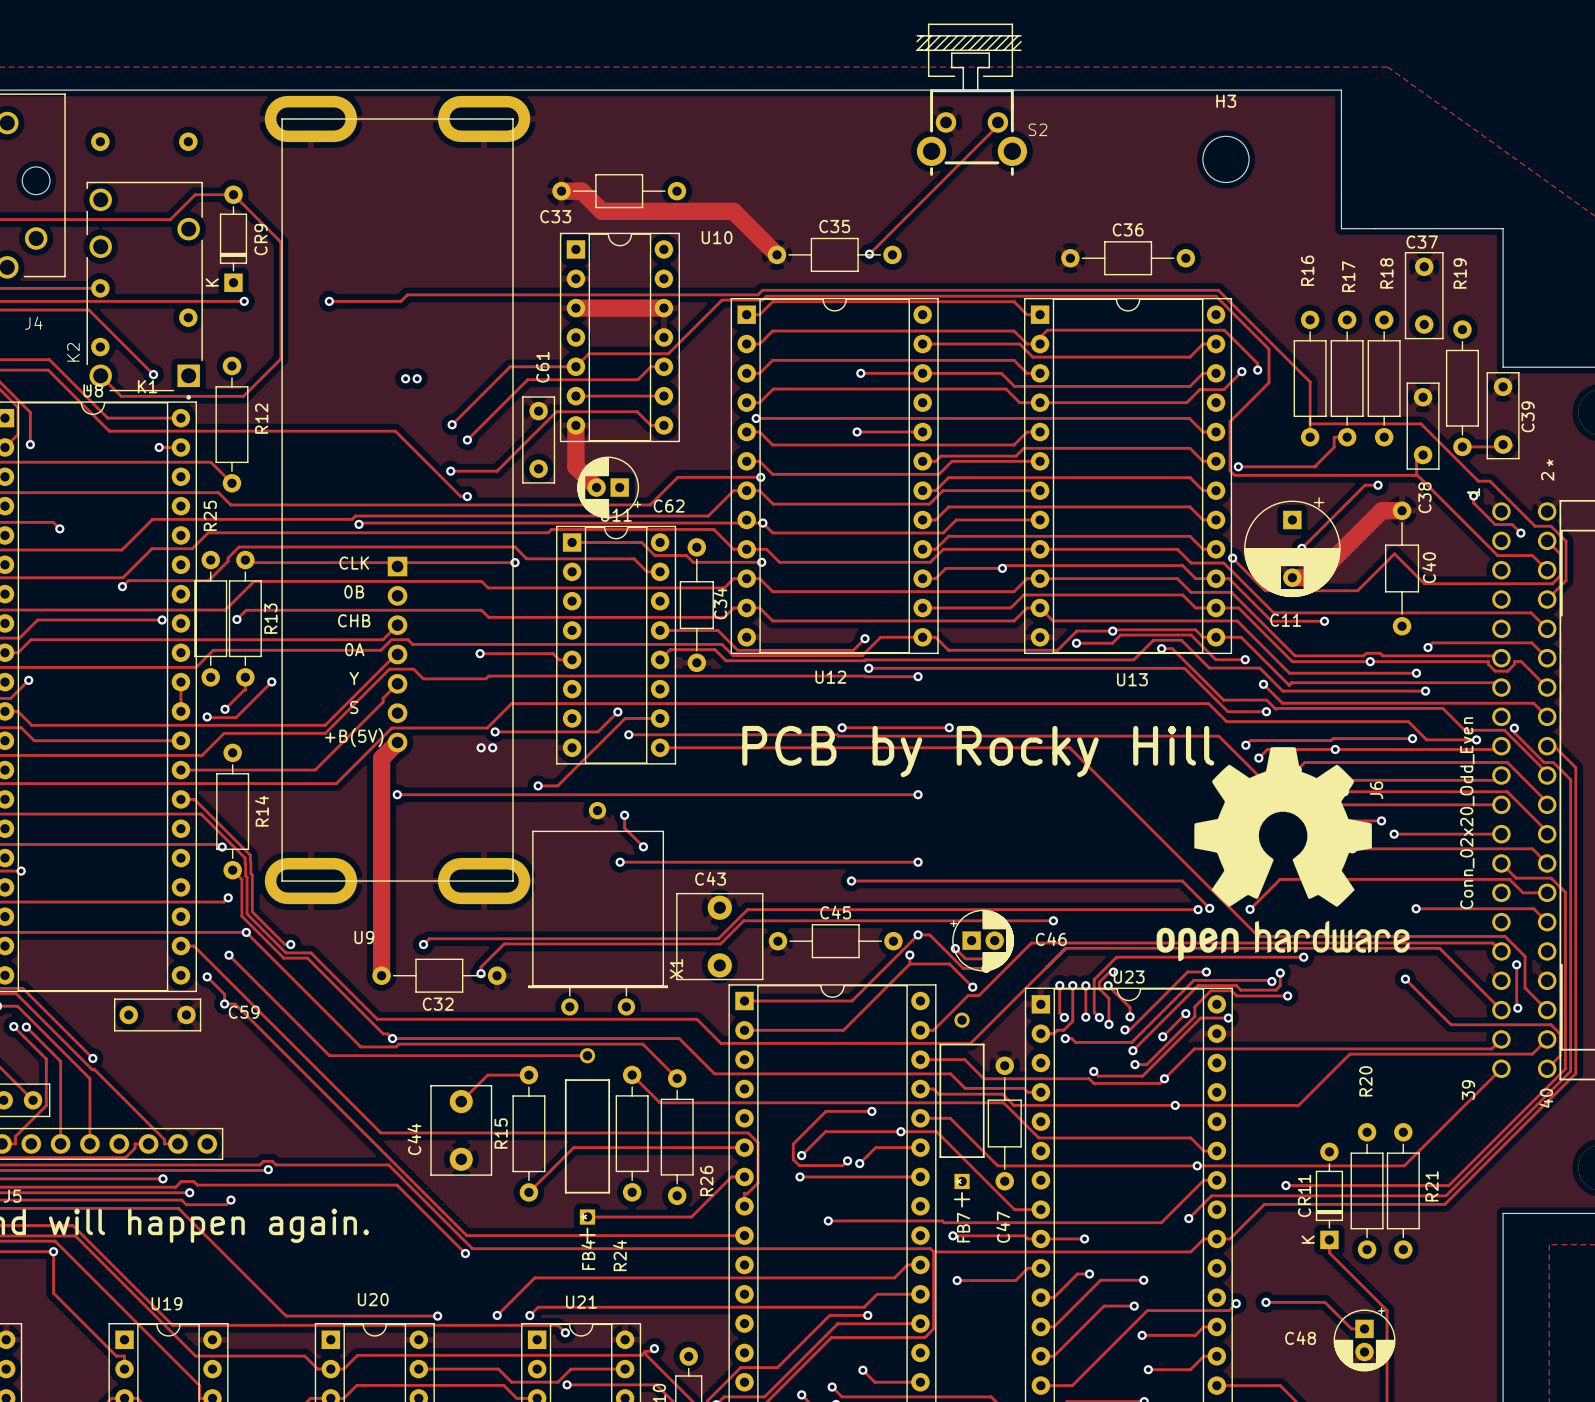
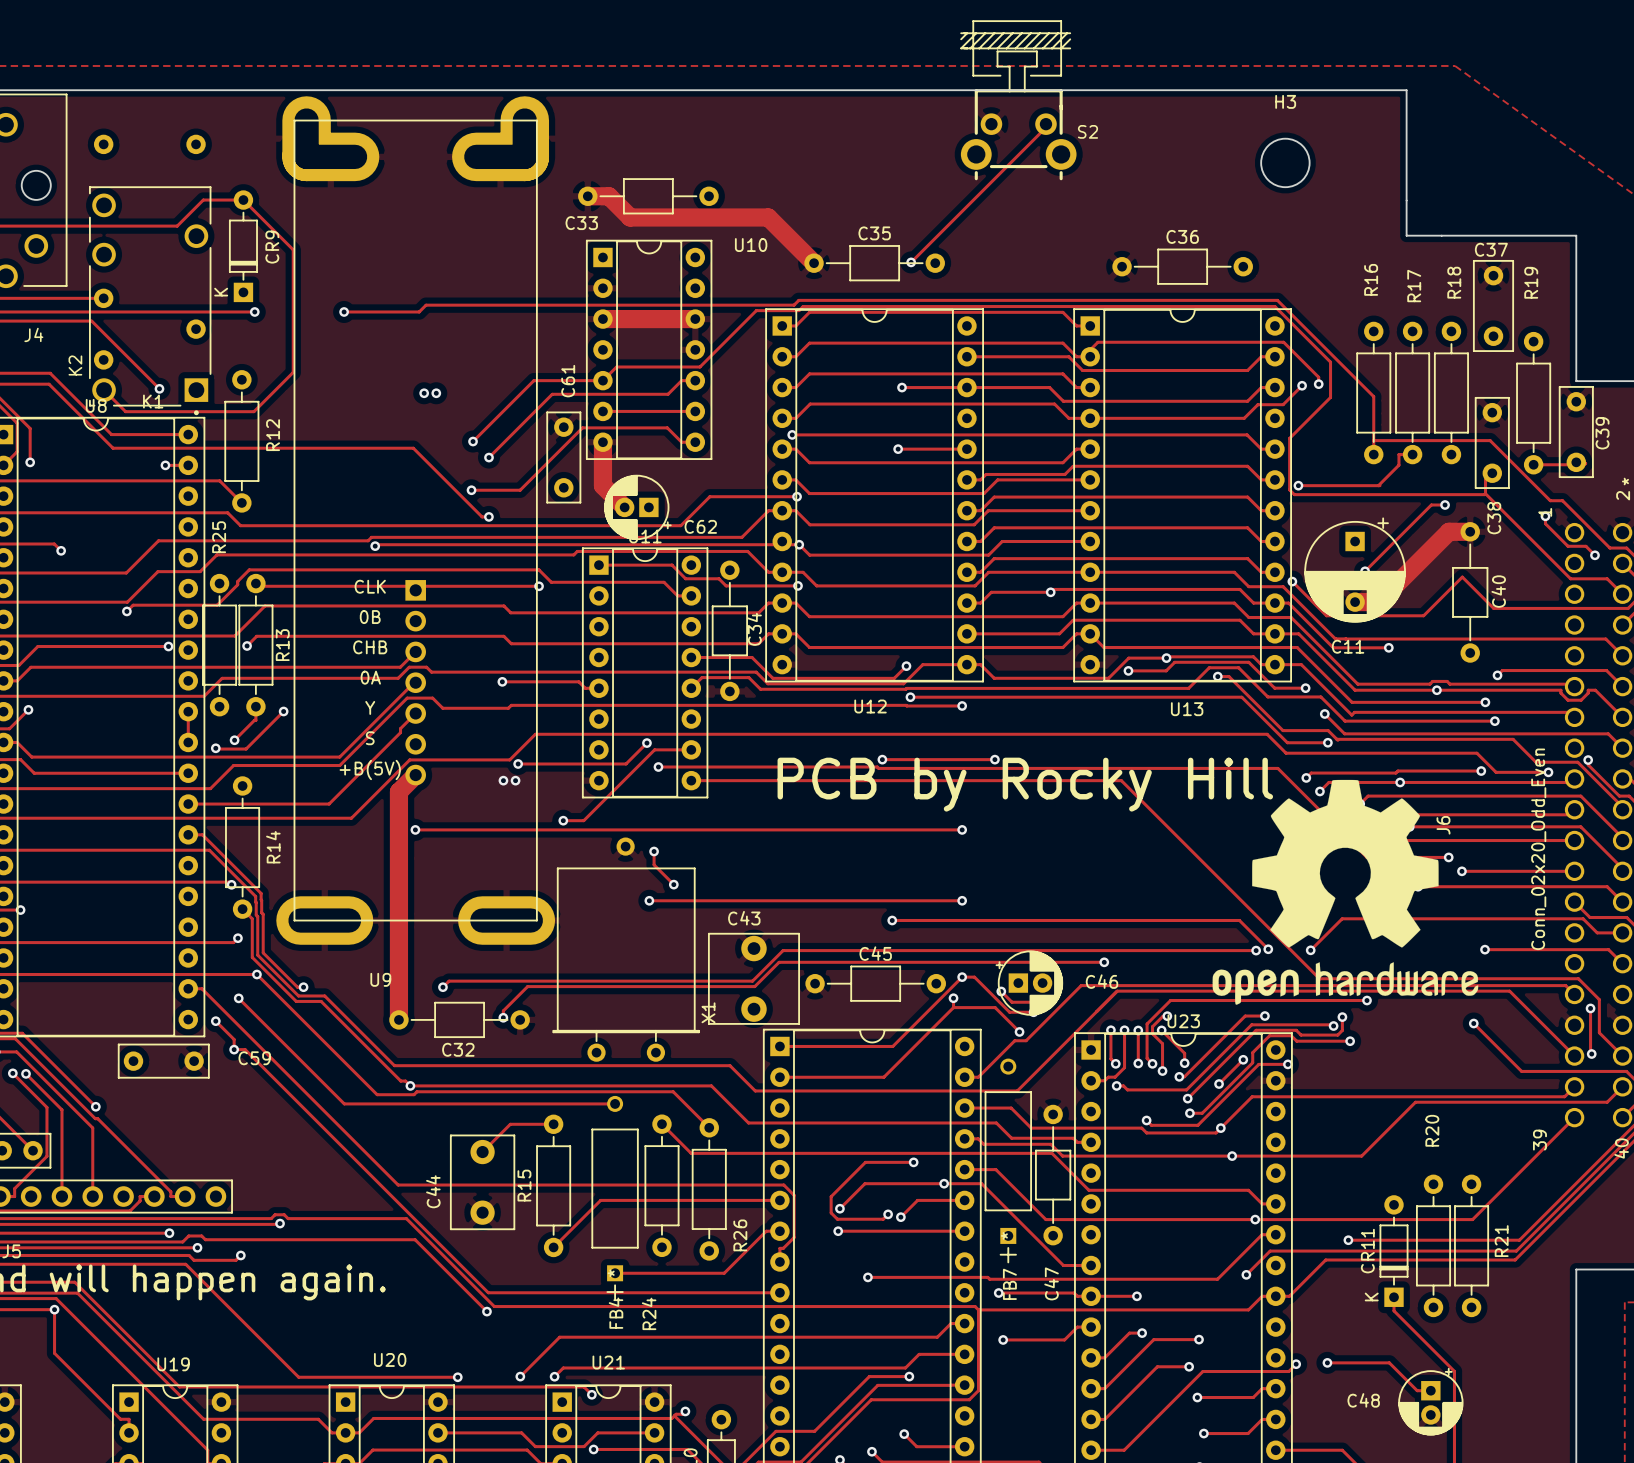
U9 footprint: [264, 95, 531, 905] -> [276, 96, 556, 945]

